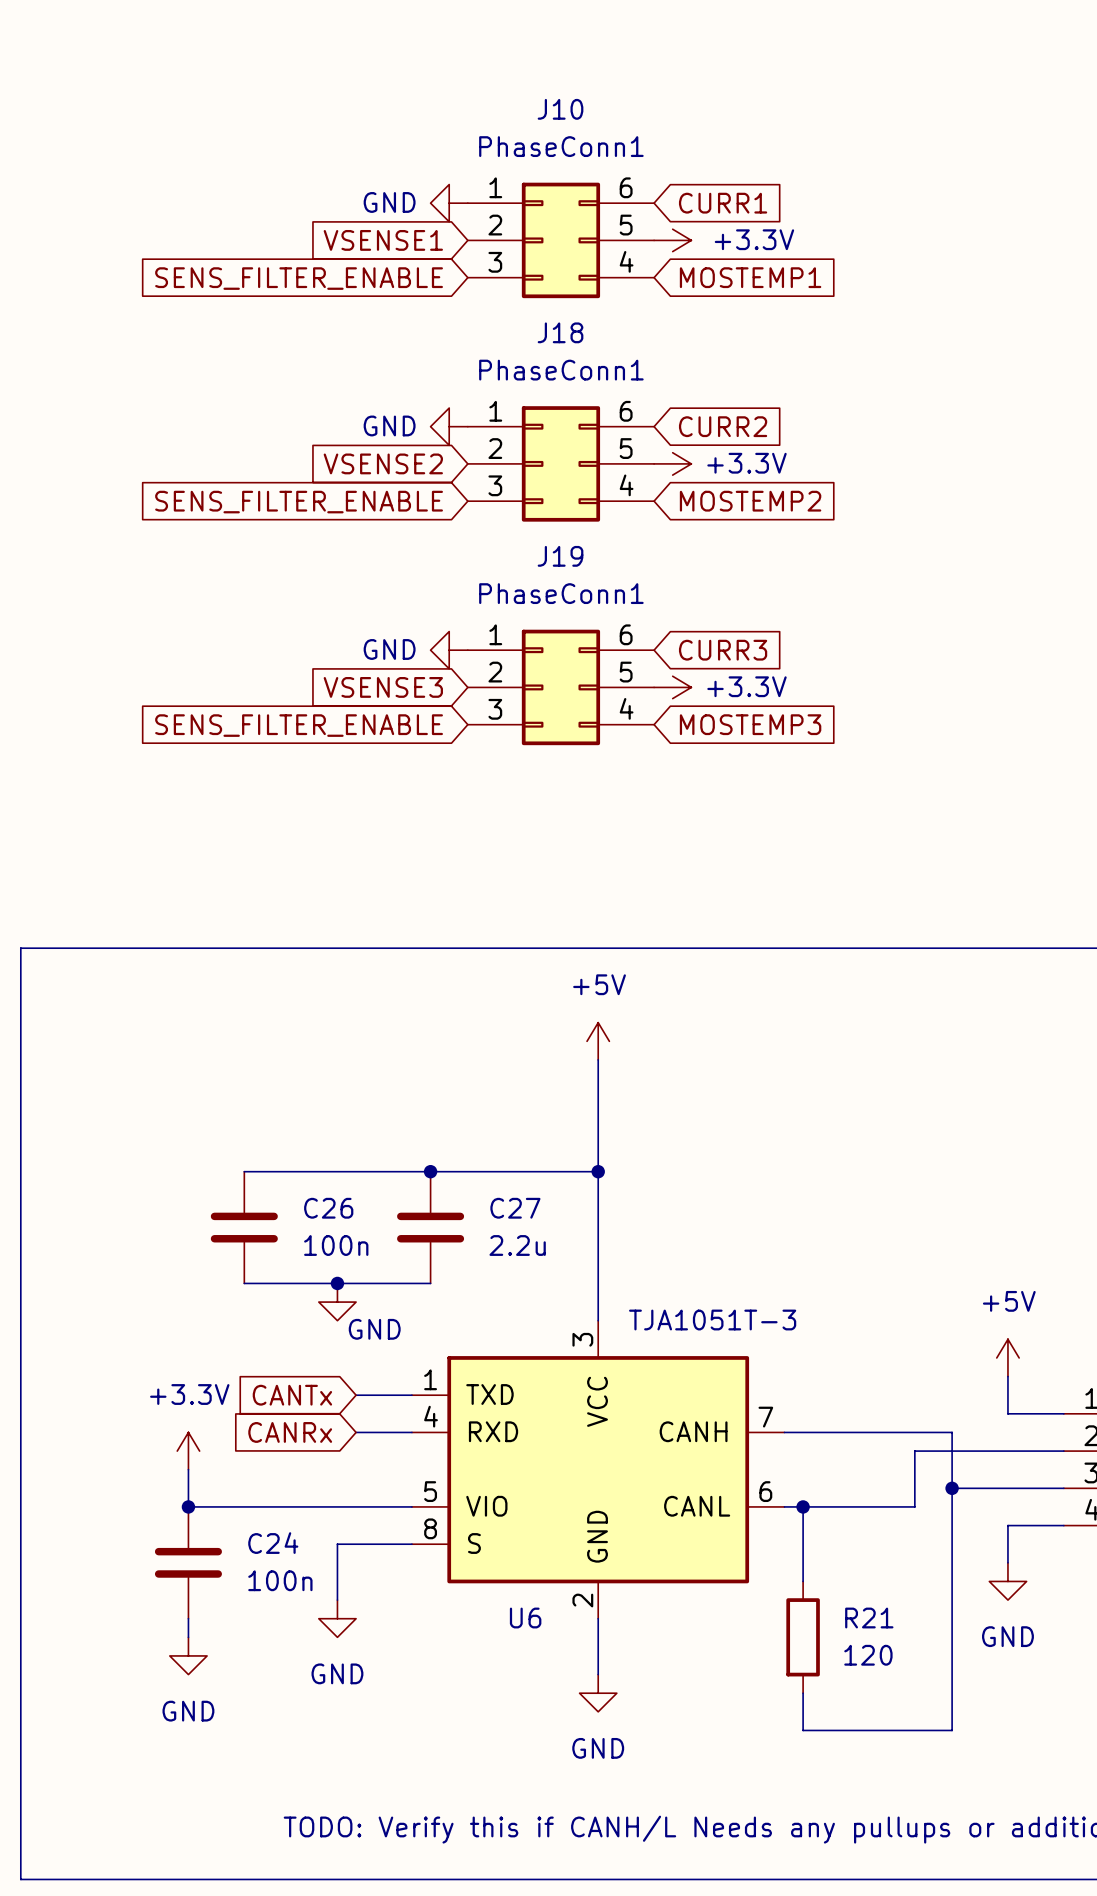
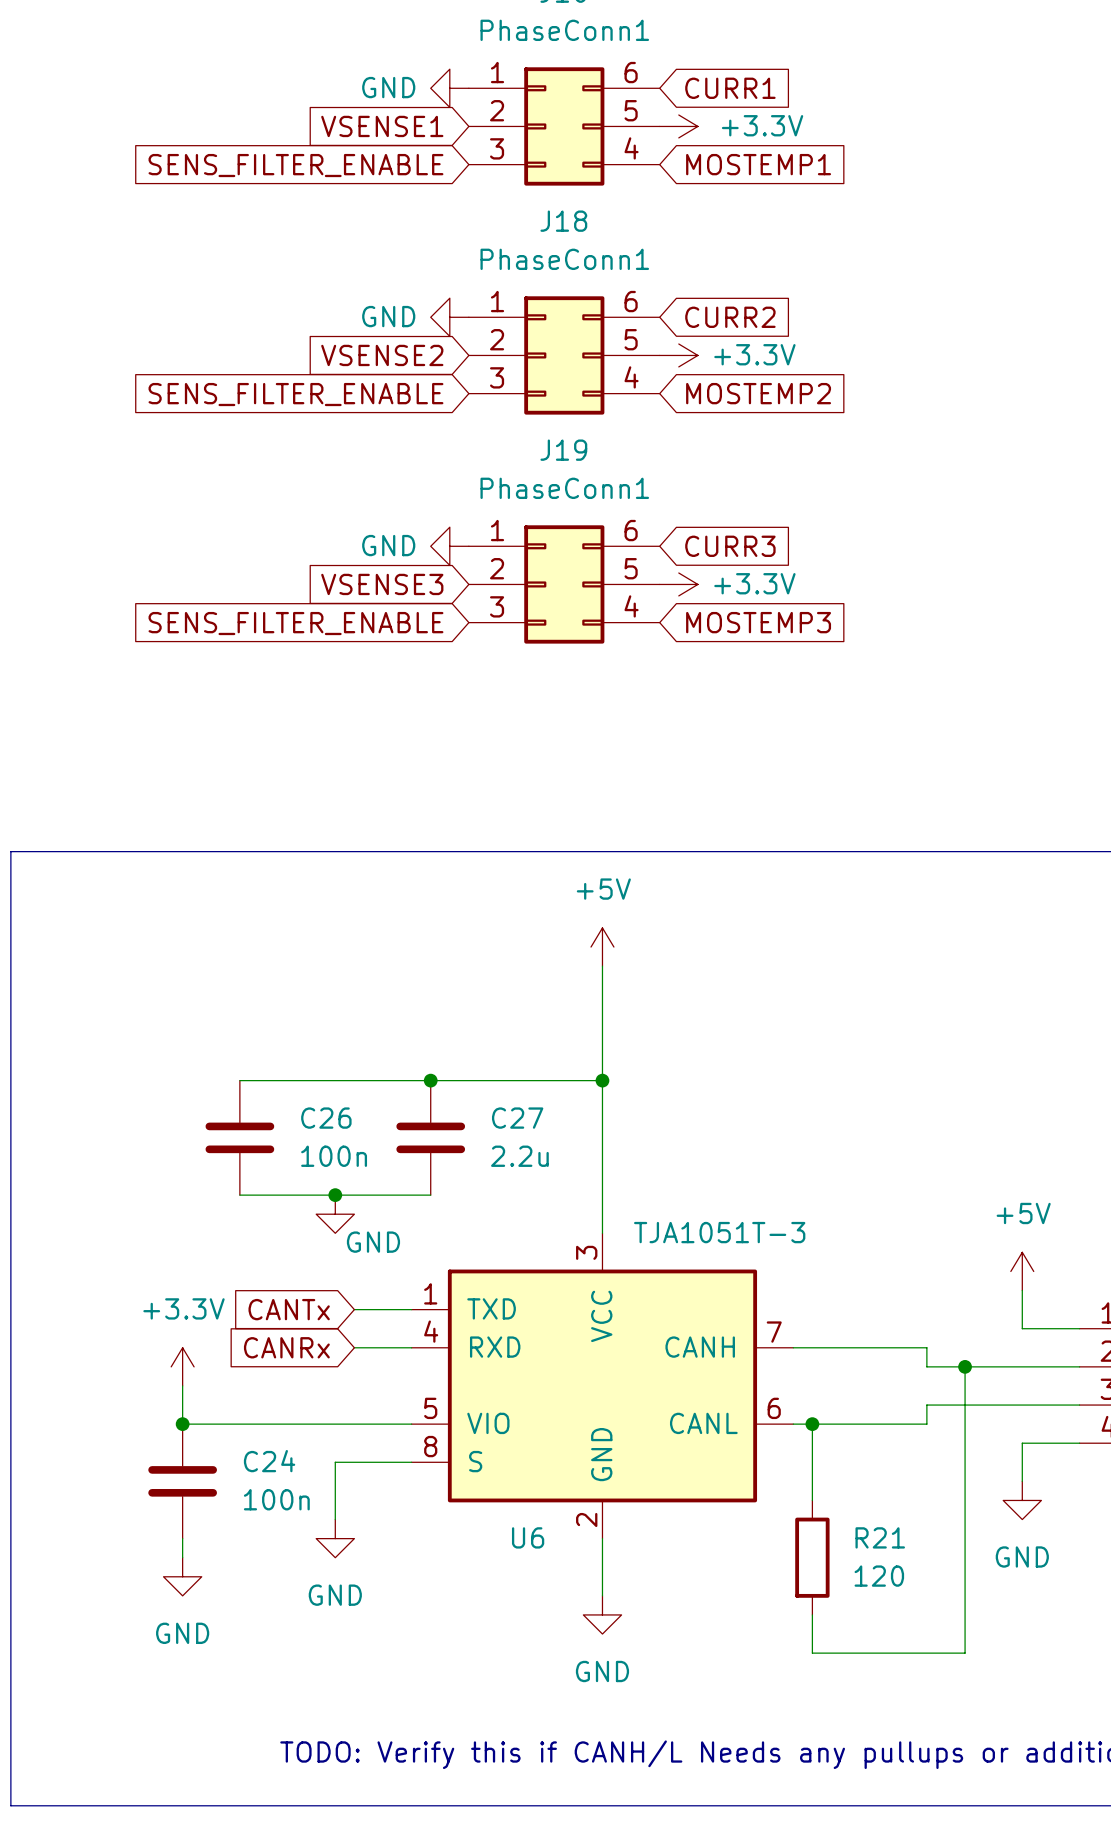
wire: (914, 1432) (952, 1432) (952, 1451) -> (926, 1347) (926, 1366)
wire: (914, 1451) (914, 1488) -> (965, 1405) (926, 1405)
junction position: (952, 1488) -> (965, 1366)

